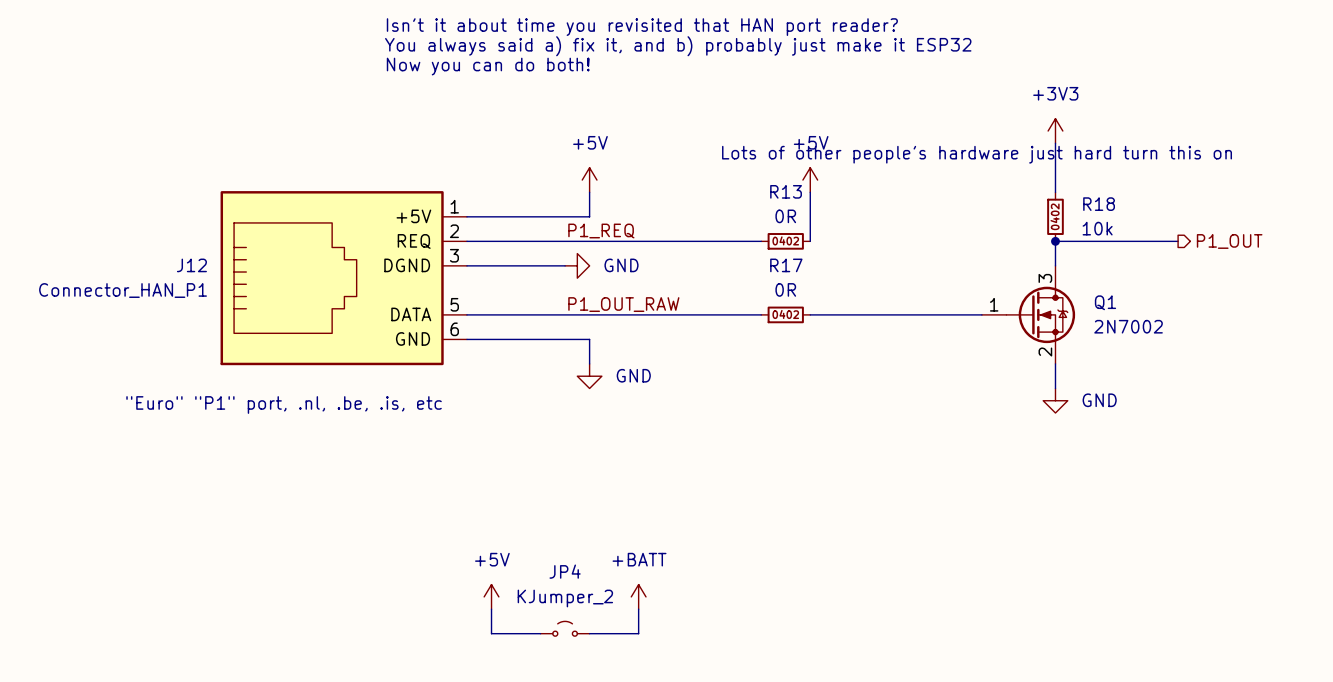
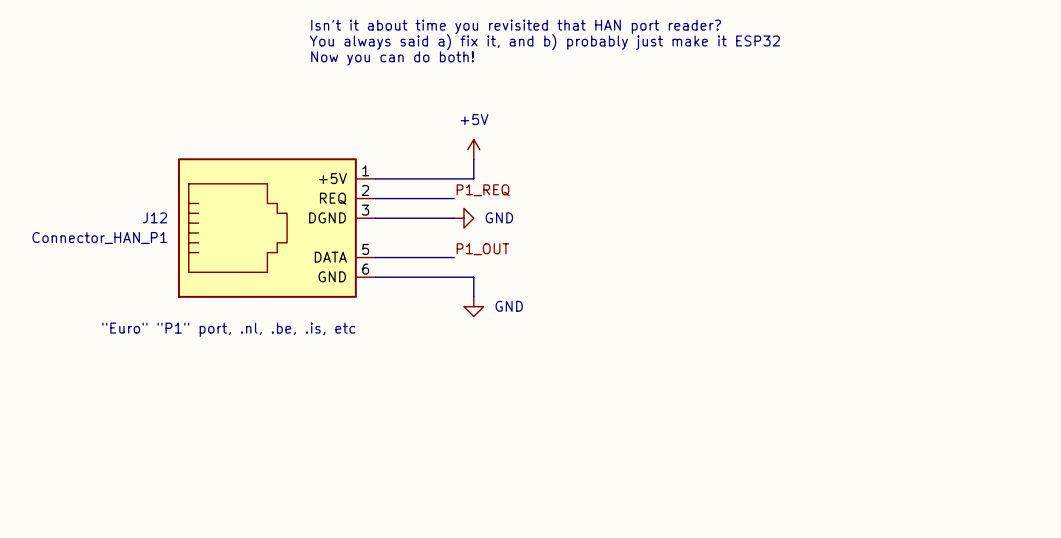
power symbol: +3V3 (1055, 131) -> none
wire: (1055, 143) (1055, 192) -> none
text: Lots of other people's hardware just hard turn this on (977, 154) -> none
power symbol: +5V (810, 180) -> none
wire: (810, 192) (810, 241) -> none
R18: 10k (1055, 216) -> none
wire: (565, 241) (761, 241) -> none
R13: 0R (785, 241) -> none
junction: (1055, 241) -> none
wire: (1178, 241) (1055, 241) (1055, 265) -> none
hierarchical label: P1_OUT (1229, 241) -> none
label: P1_OUT_RAW (623, 304) -> P1_OUT (483, 249)
wire: (565, 314) (761, 314) -> none
R17: 0R (785, 314) -> none
wire: (810, 314) (981, 314) -> none
Q1: 2N7002 (1028, 314) -> none
wire: (1055, 363) (1055, 388) -> none
power symbol: GND (1055, 400) -> none
power symbol: +5V (491, 596) -> none
power symbol: +BATT (638, 596) -> none
wire: (491, 609) (491, 633) (540, 633) -> none
wire: (638, 609) (638, 633) (589, 633) -> none
JP4: KJumper_2 (565, 628) -> none

